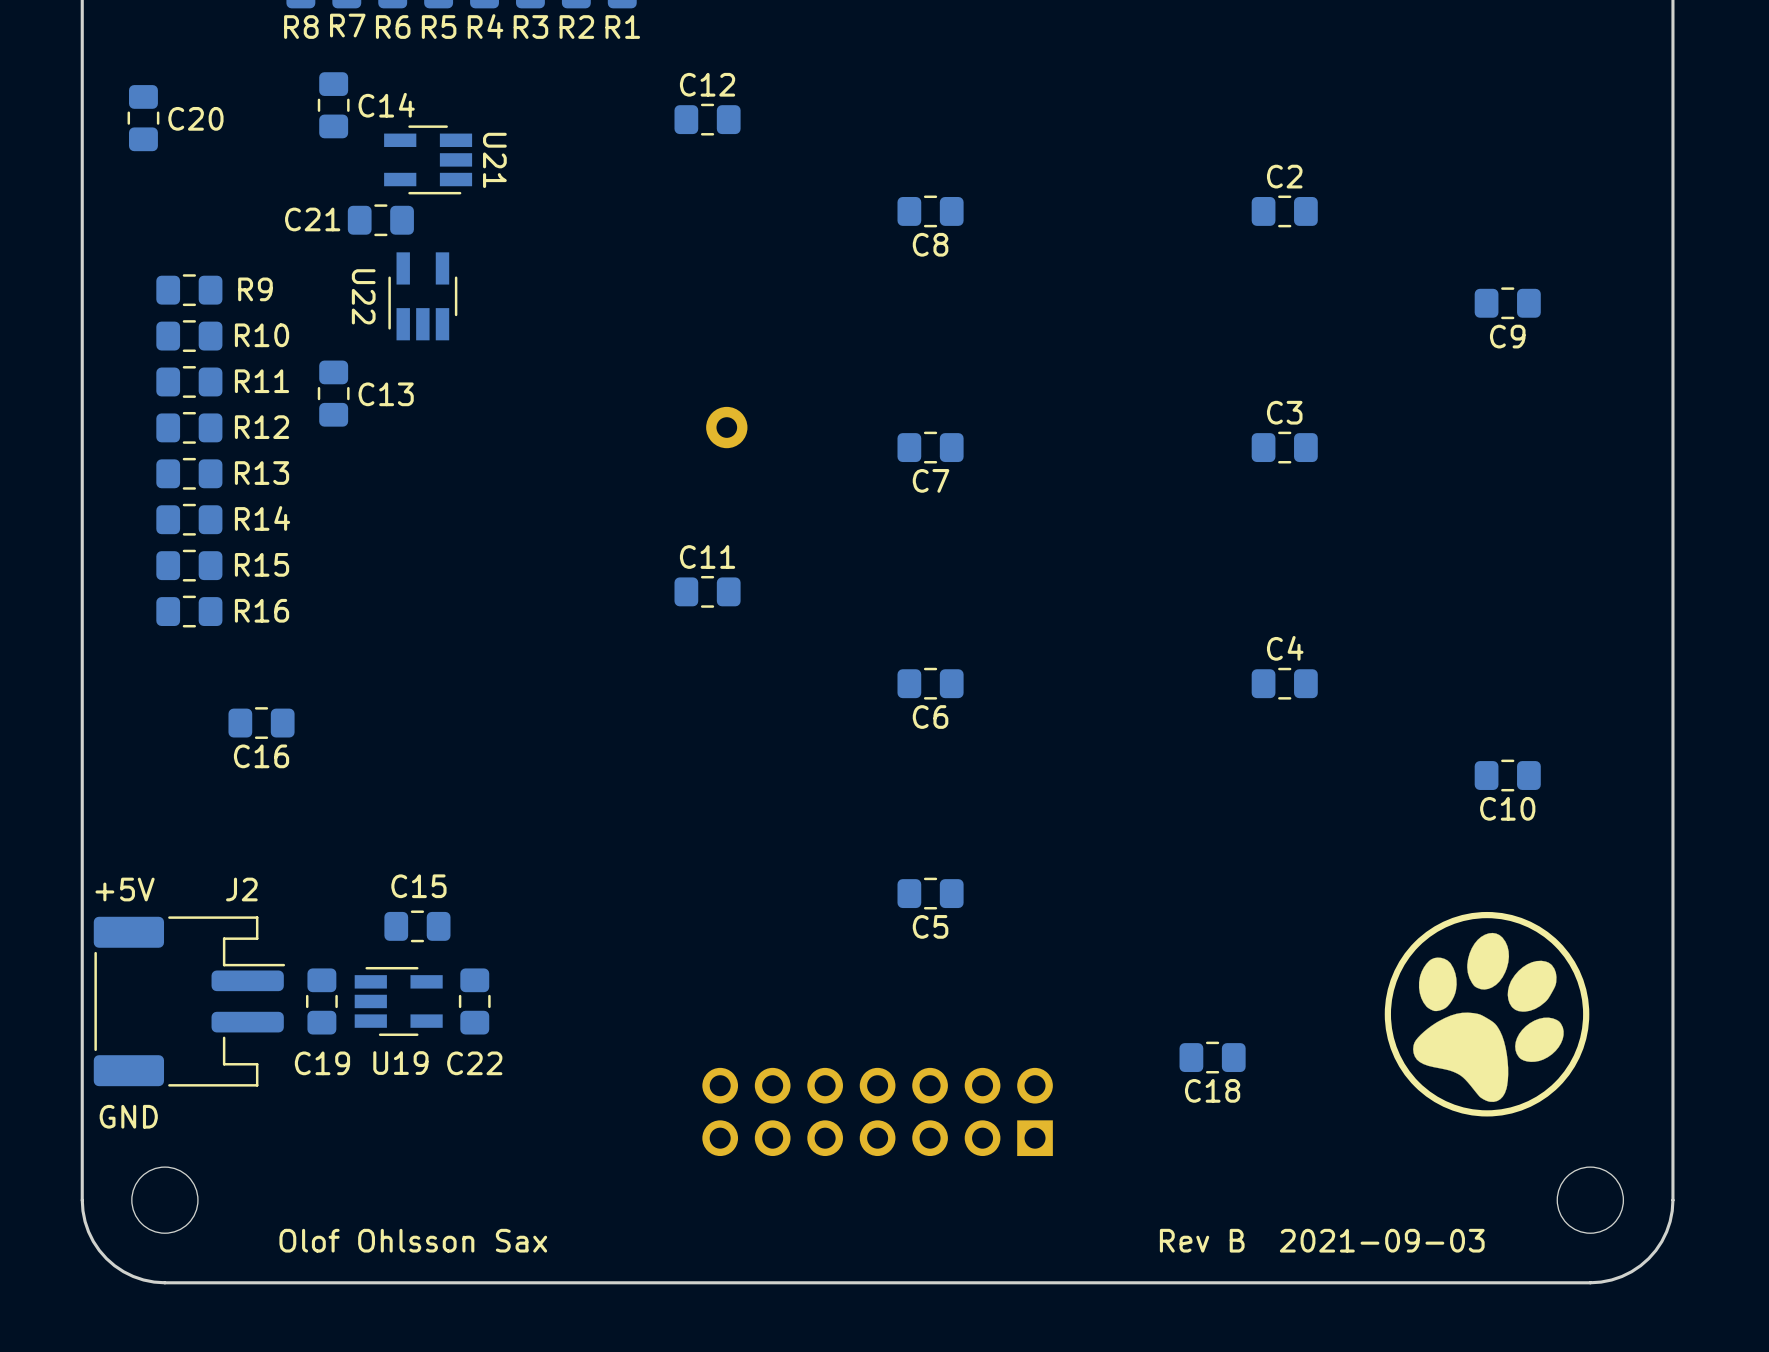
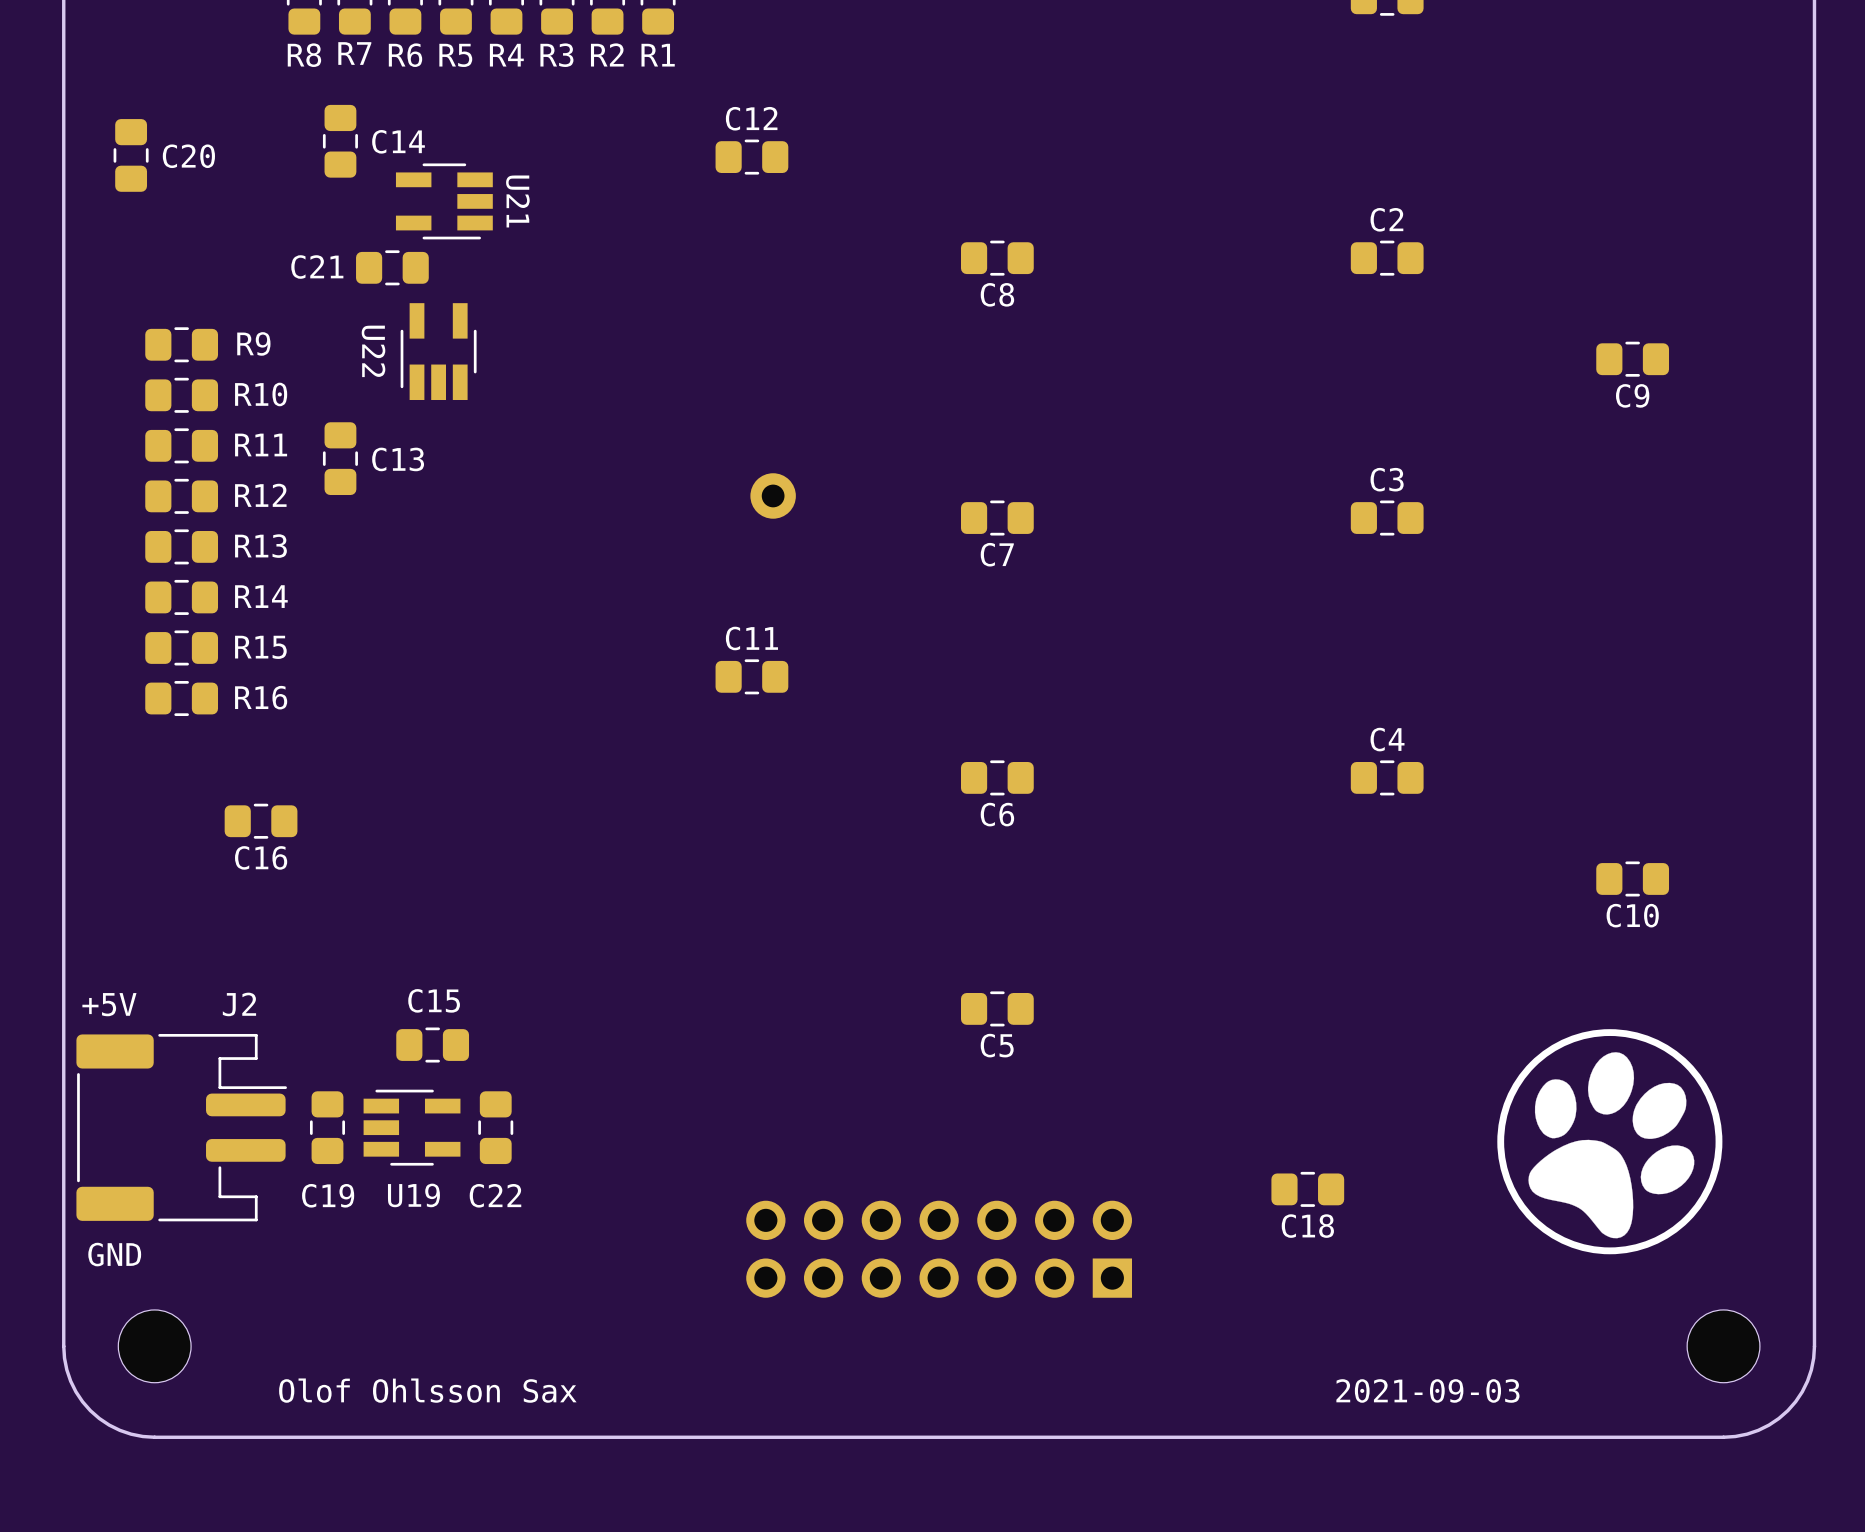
text: Rev B 2021-09-03 (1322, 1240) -> 2021-09-03 (1427, 1390)

